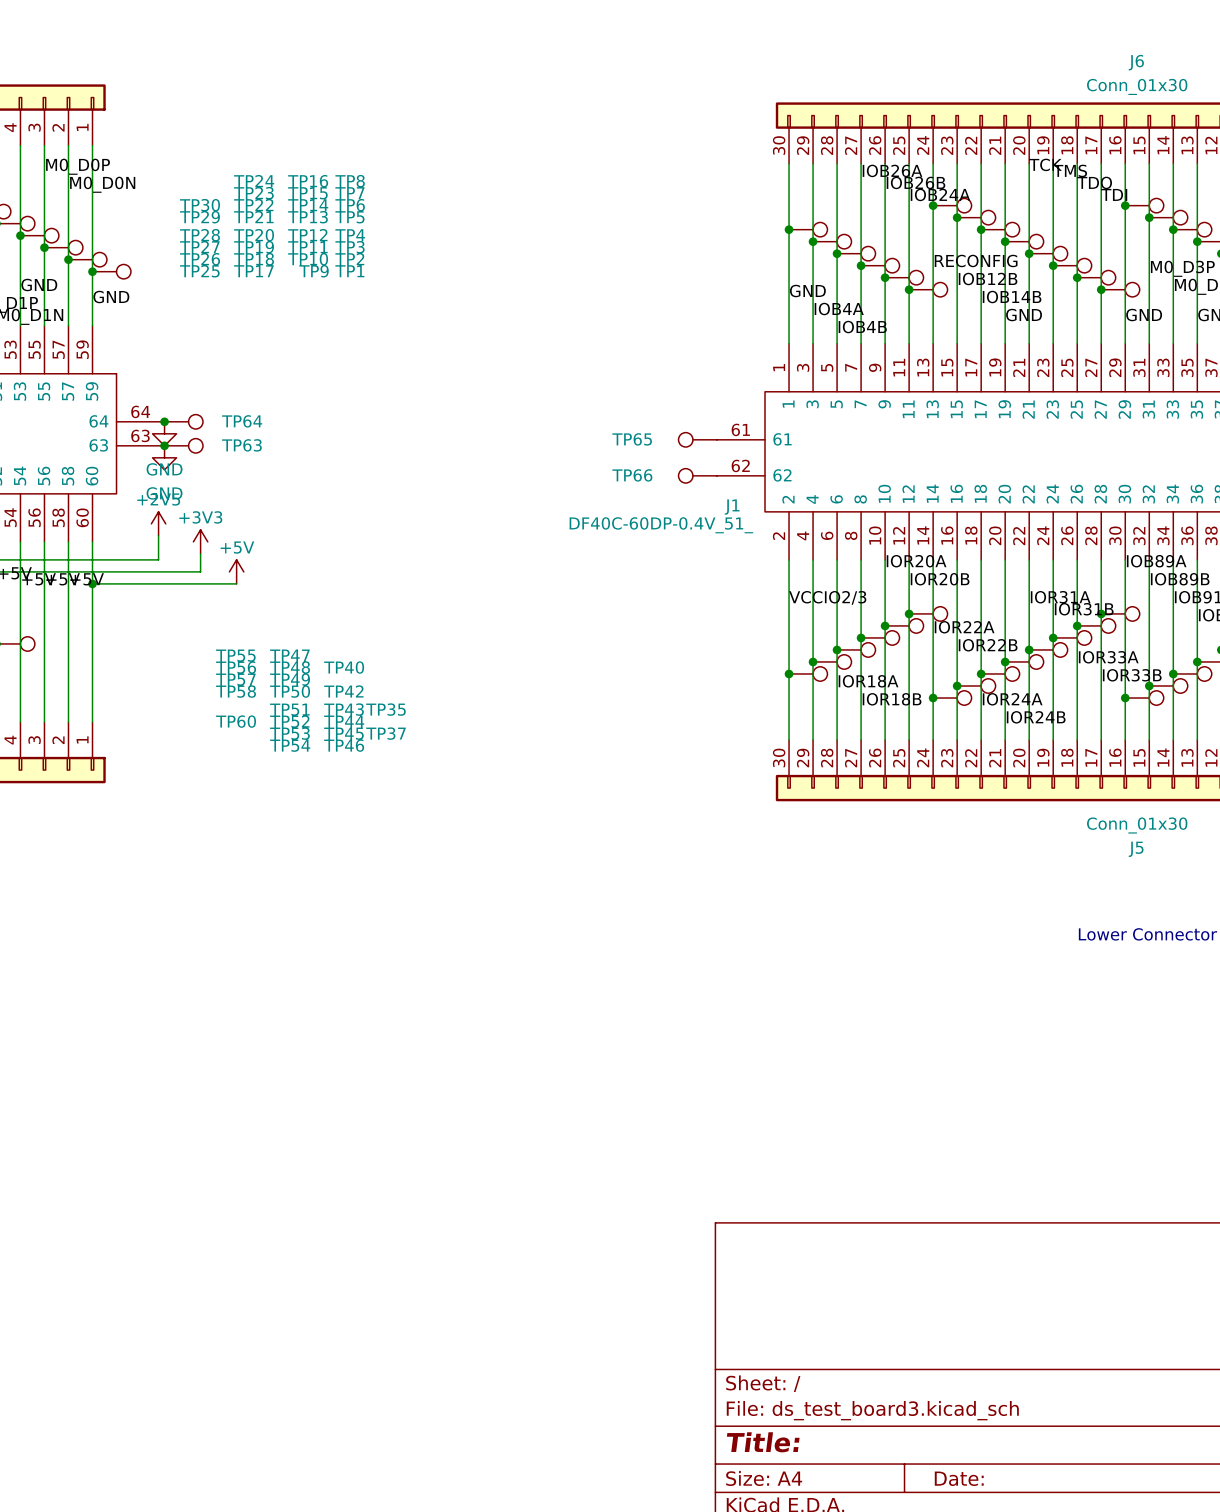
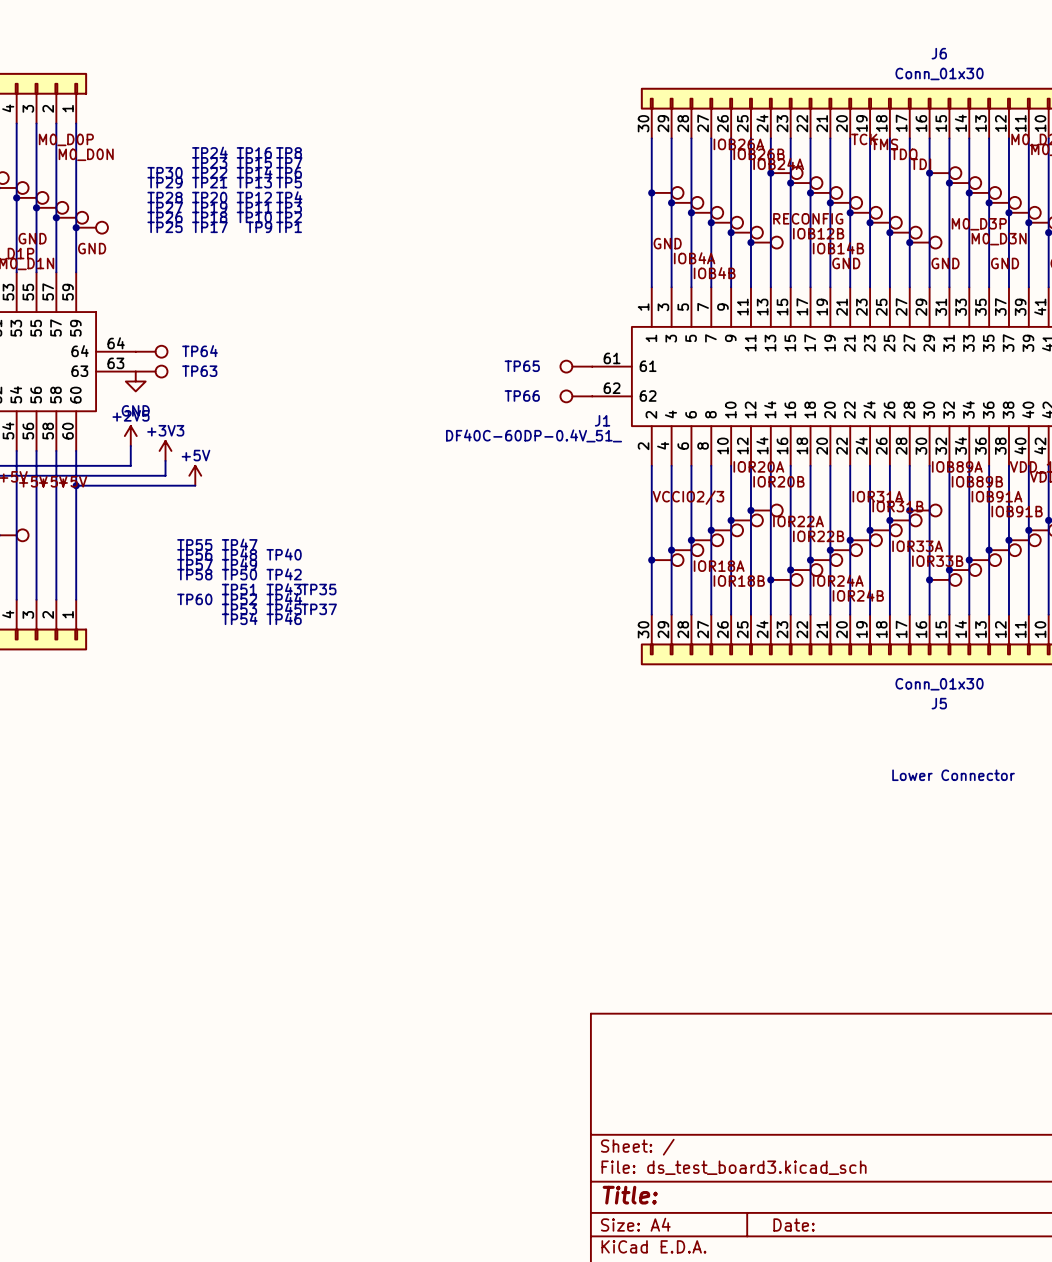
junction: (164, 421) -> none
power symbol: GND (164, 433) -> none
junction: (164, 445) -> none

